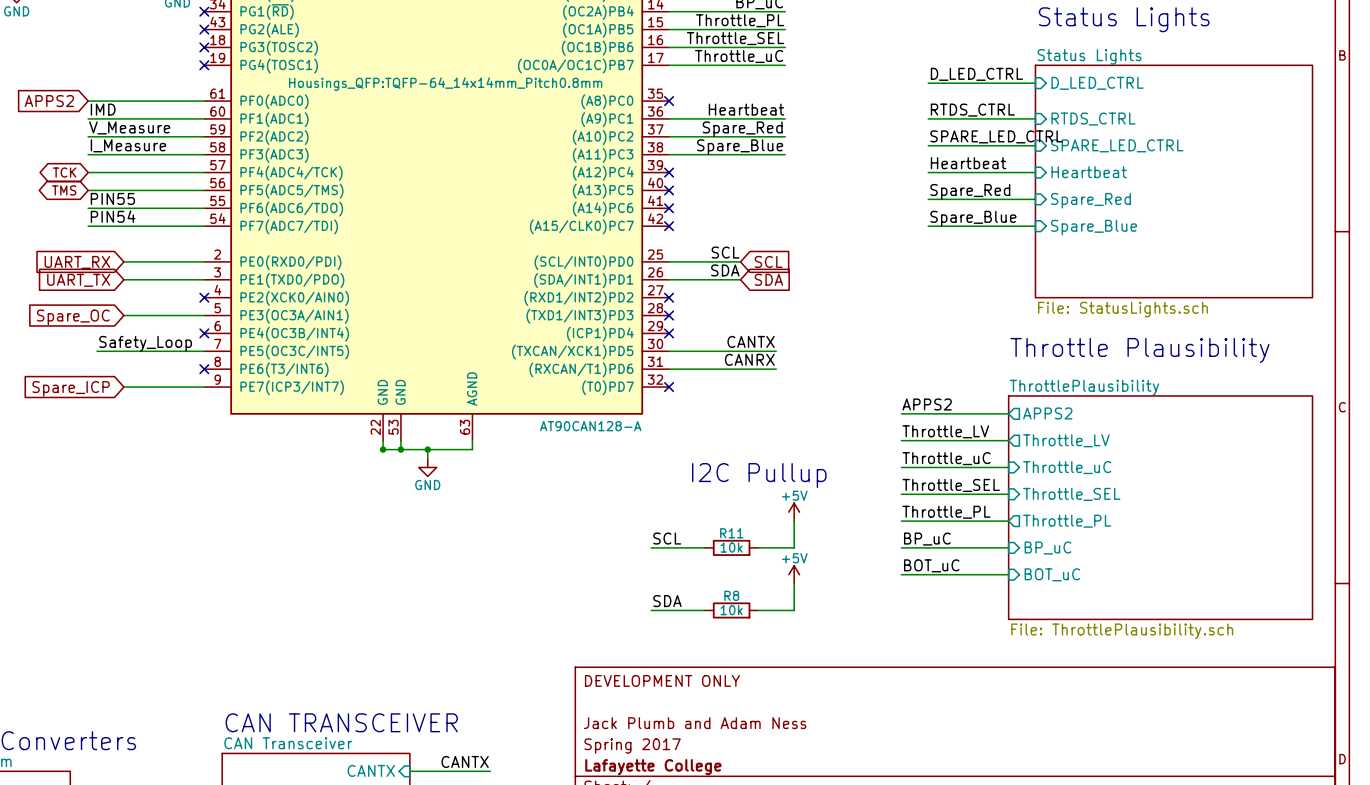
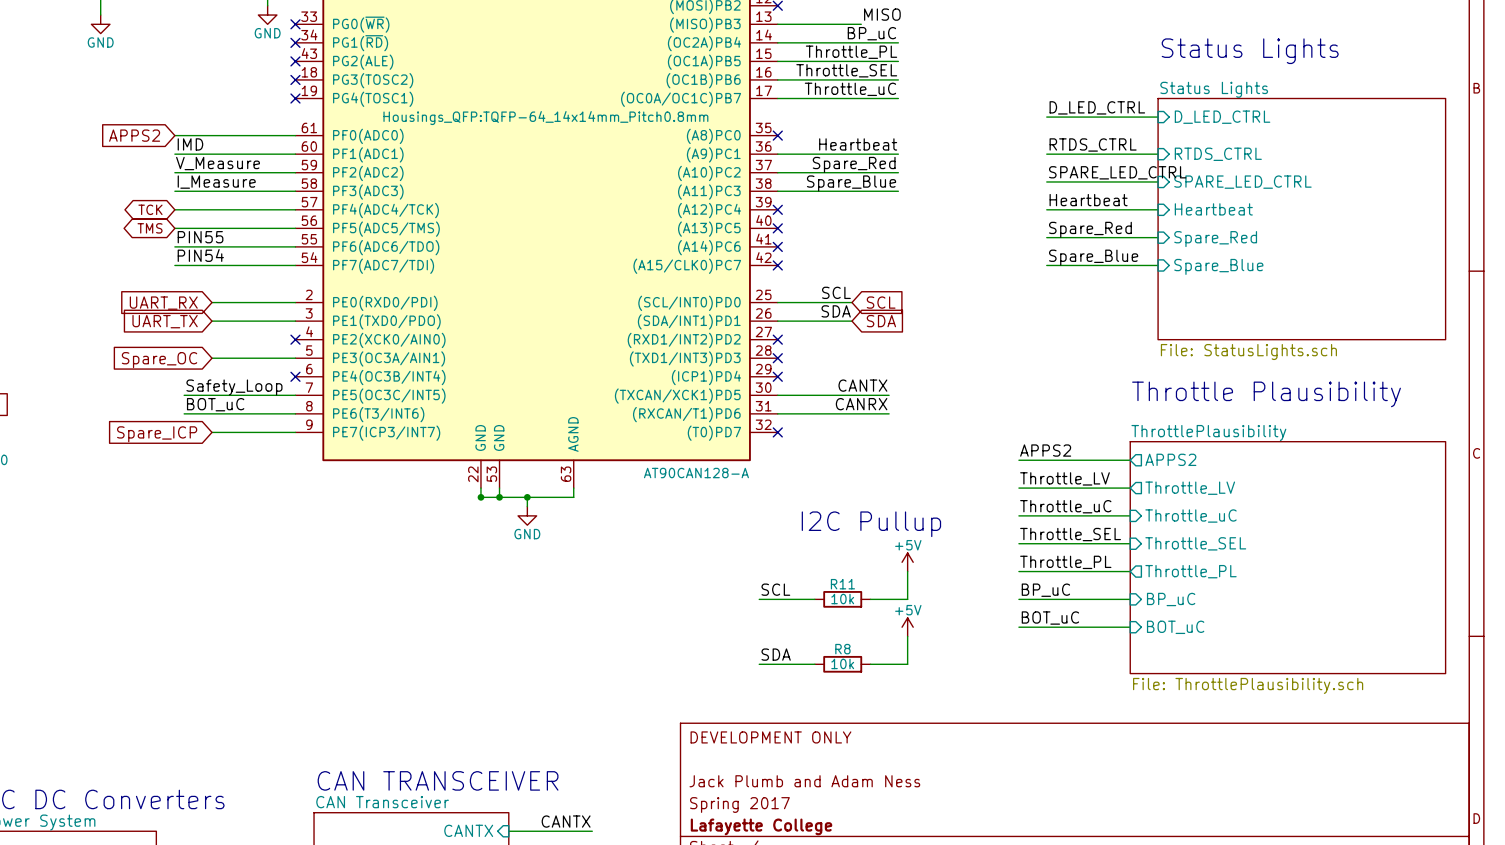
label: none -> BOT_uC (215, 404)
wire: none -> (184, 413) (295, 413)
no-connect mark: (204, 369) -> none

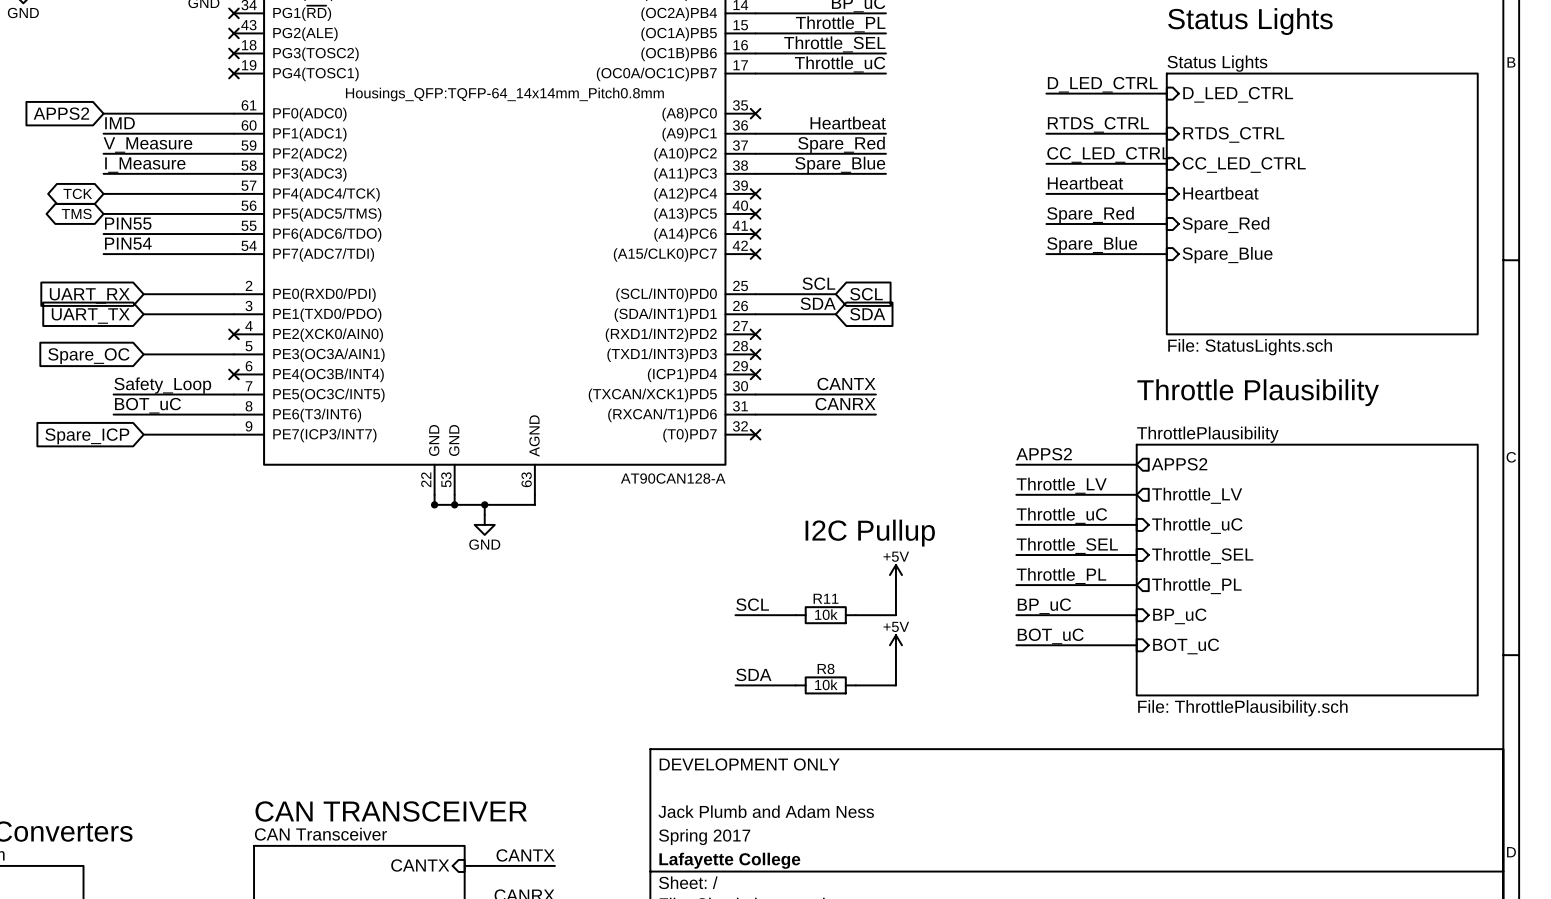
label: SPARE_LED_CTRL (1117, 172) -> CC_LED_CTRL (1108, 154)
sheet pin: SPARE_LED_CTRL (1242, 182) -> CC_LED_CTRL (1244, 165)

